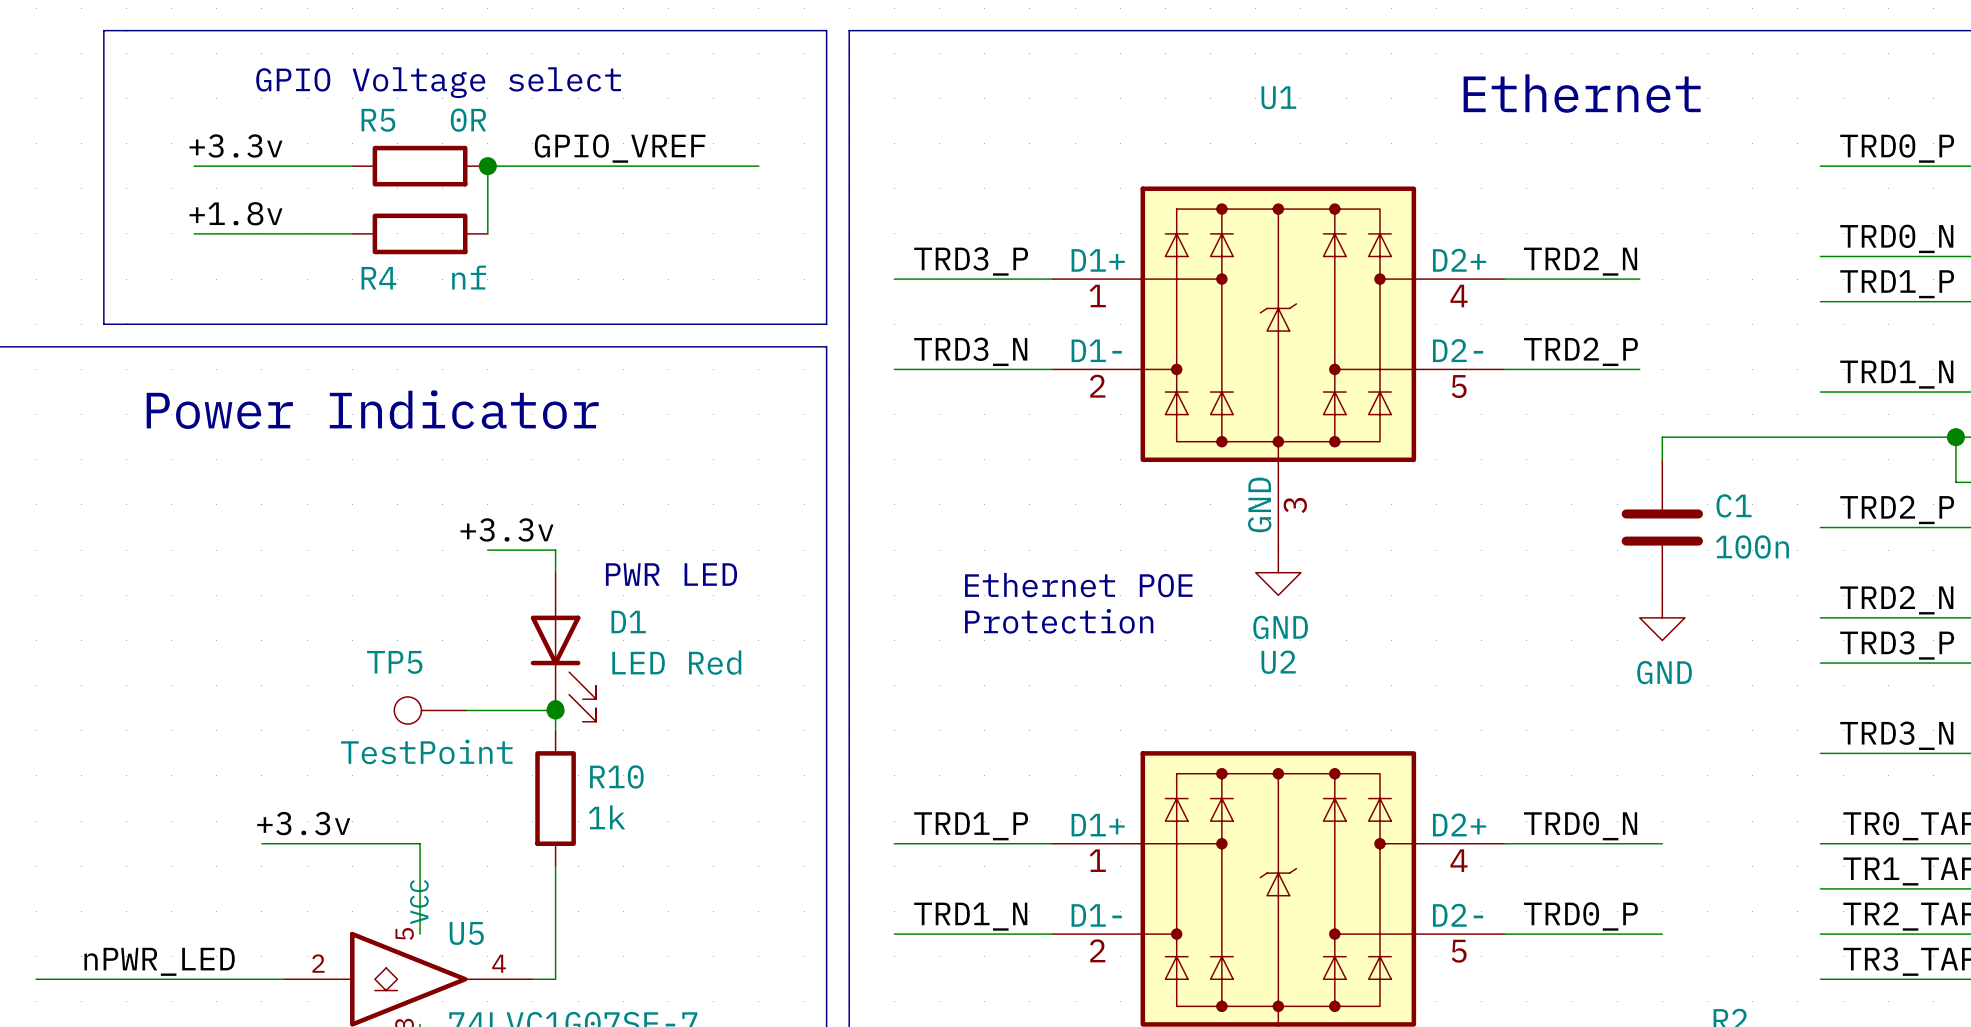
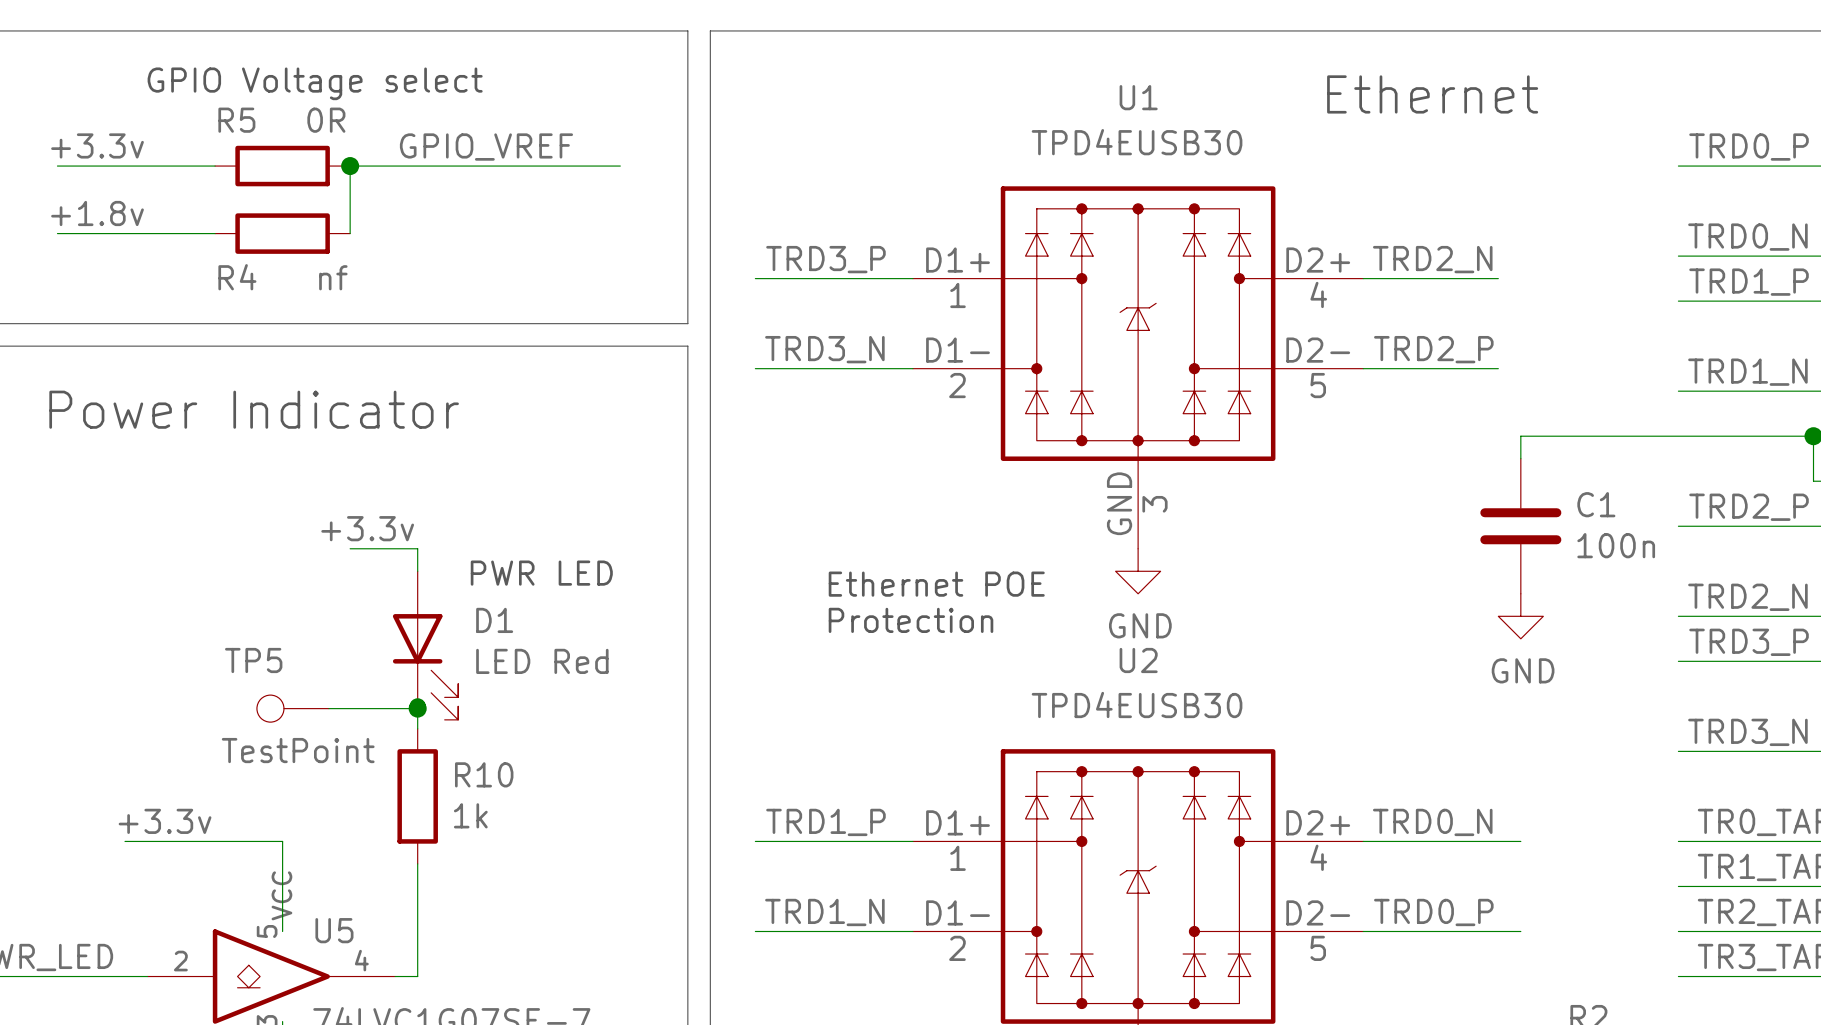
U1 value: none -> TPD4EUSB30 (1137, 142)
U2 value: none -> TPD4EUSB30 (1137, 704)

